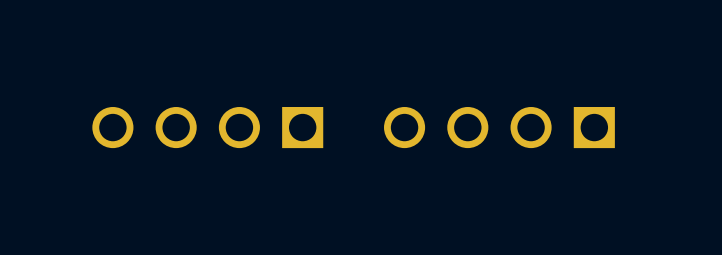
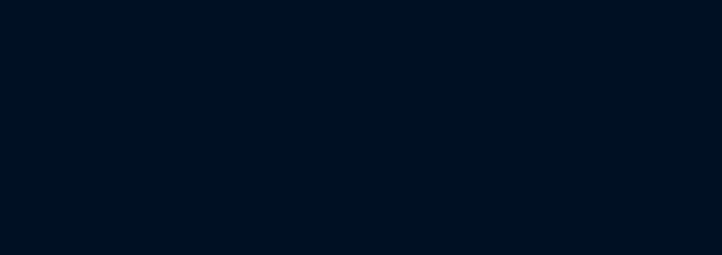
part: (207, 127) -> none
part: (499, 127) -> none

